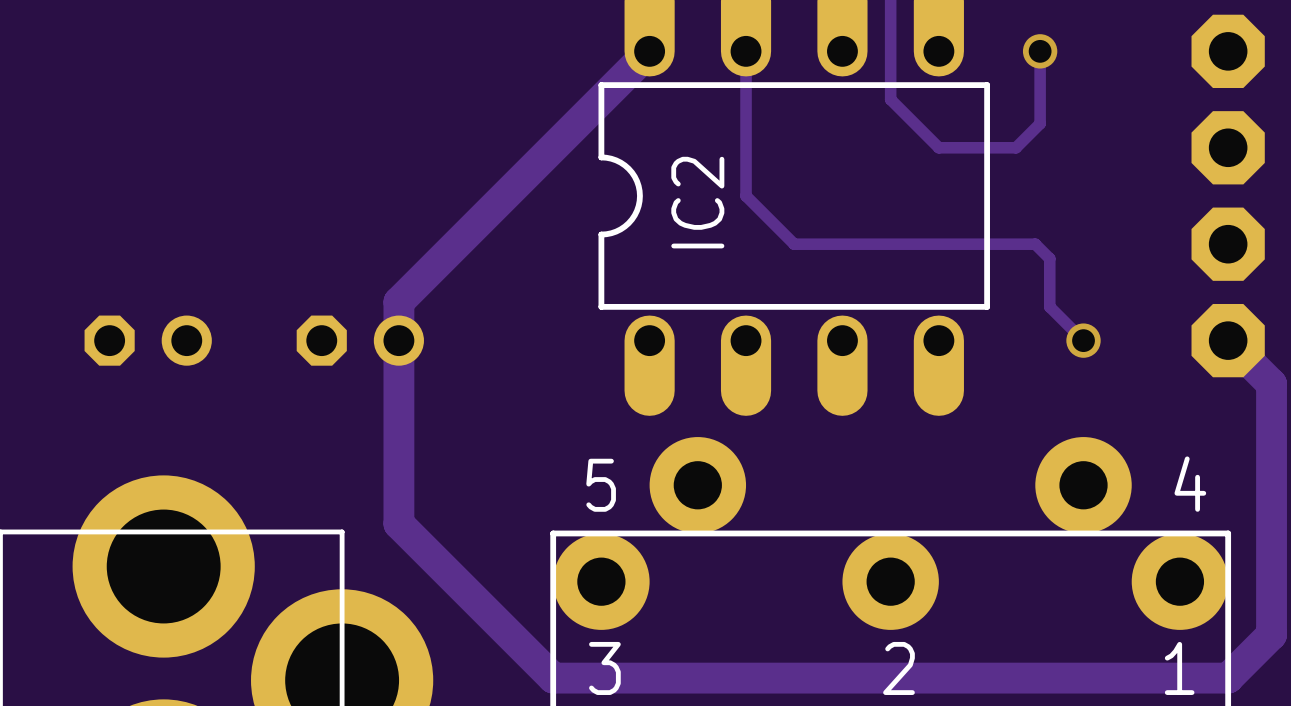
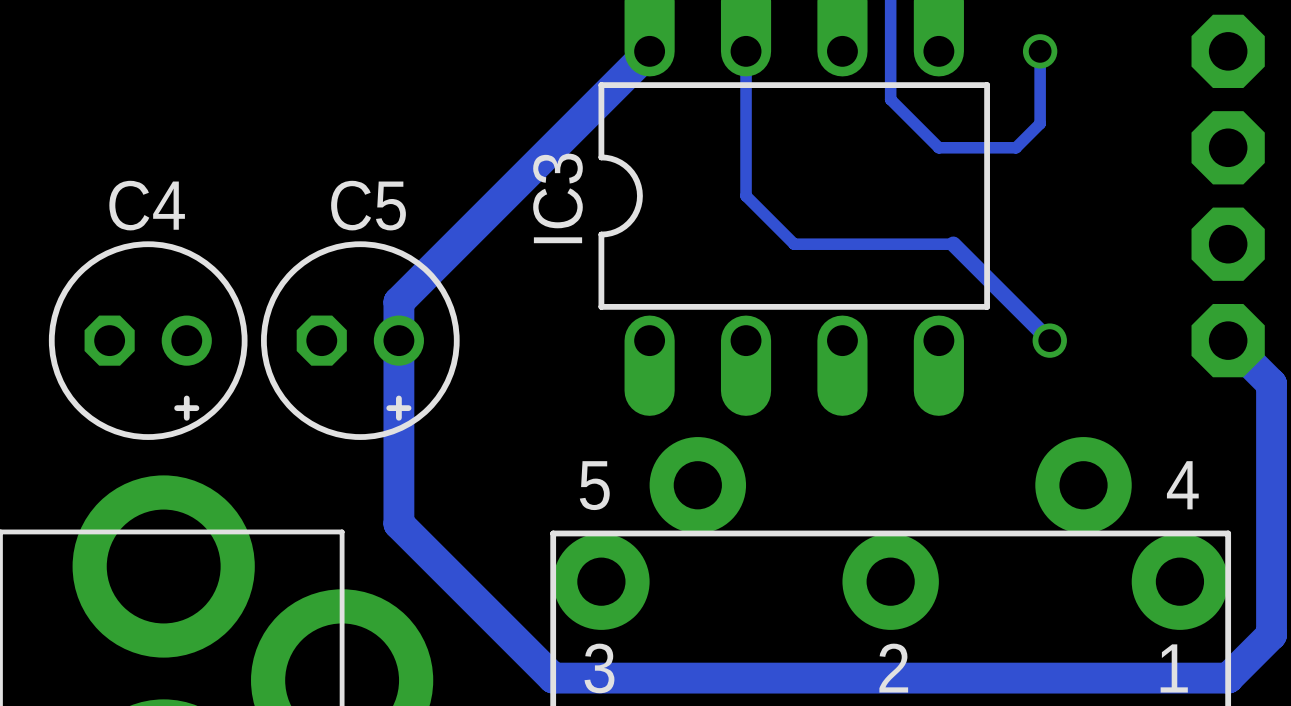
IC2 name: IC2 (697, 202) -> IC3 (557, 198)
track: (953, 244) (1035, 244) (1049, 258) (1049, 306) (1083, 340) -> (953, 244) (1049, 340)
C4: none -> (148, 340)
C5 side: top (360, 340) -> bottom (360, 340)
via position: (1083, 340) -> (1049, 340)

